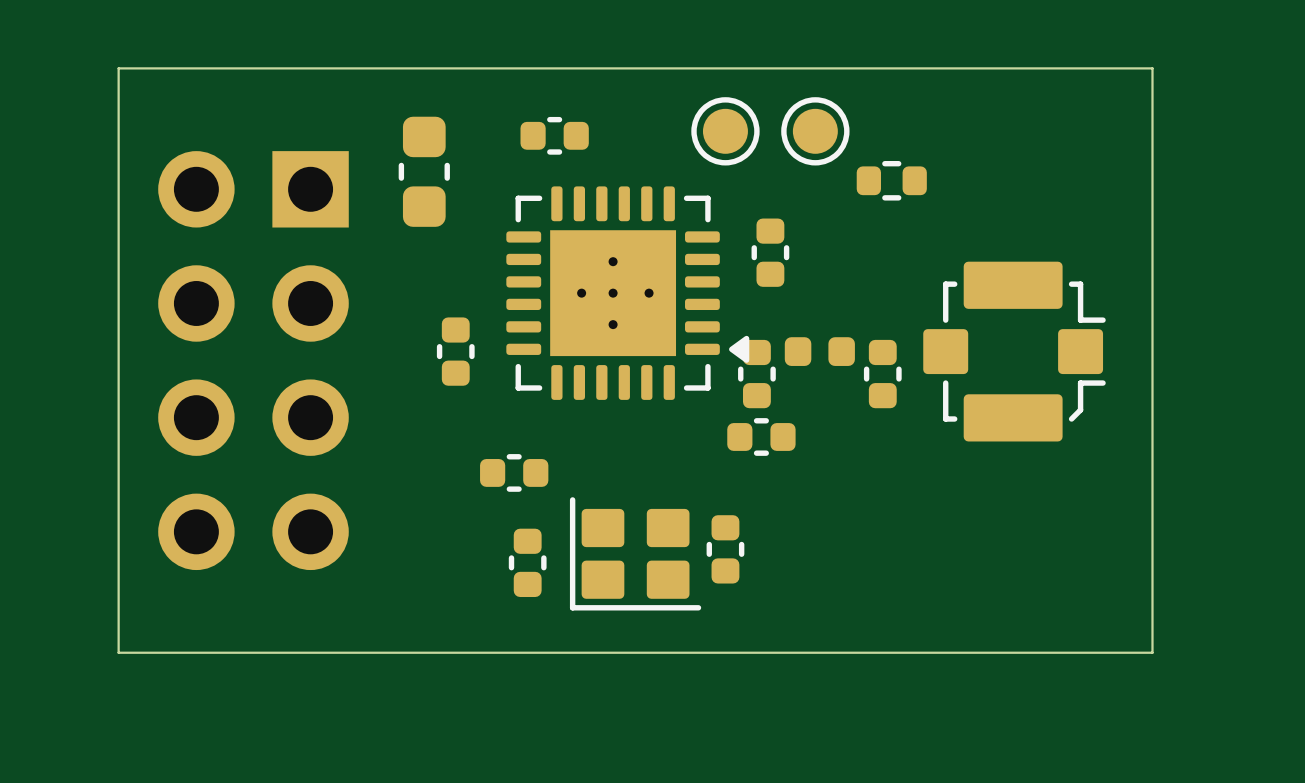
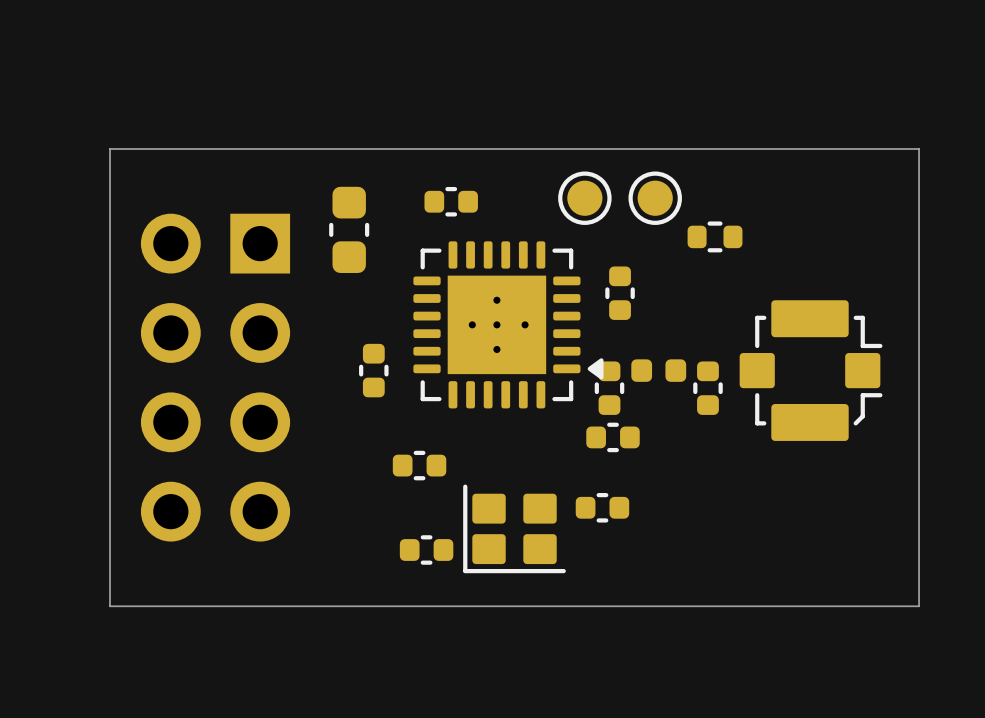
part rotation: 0° (725, 549) -> 90° clockwise (602, 507)
part rotation: 0° (527, 562) -> 90° clockwise (426, 549)

